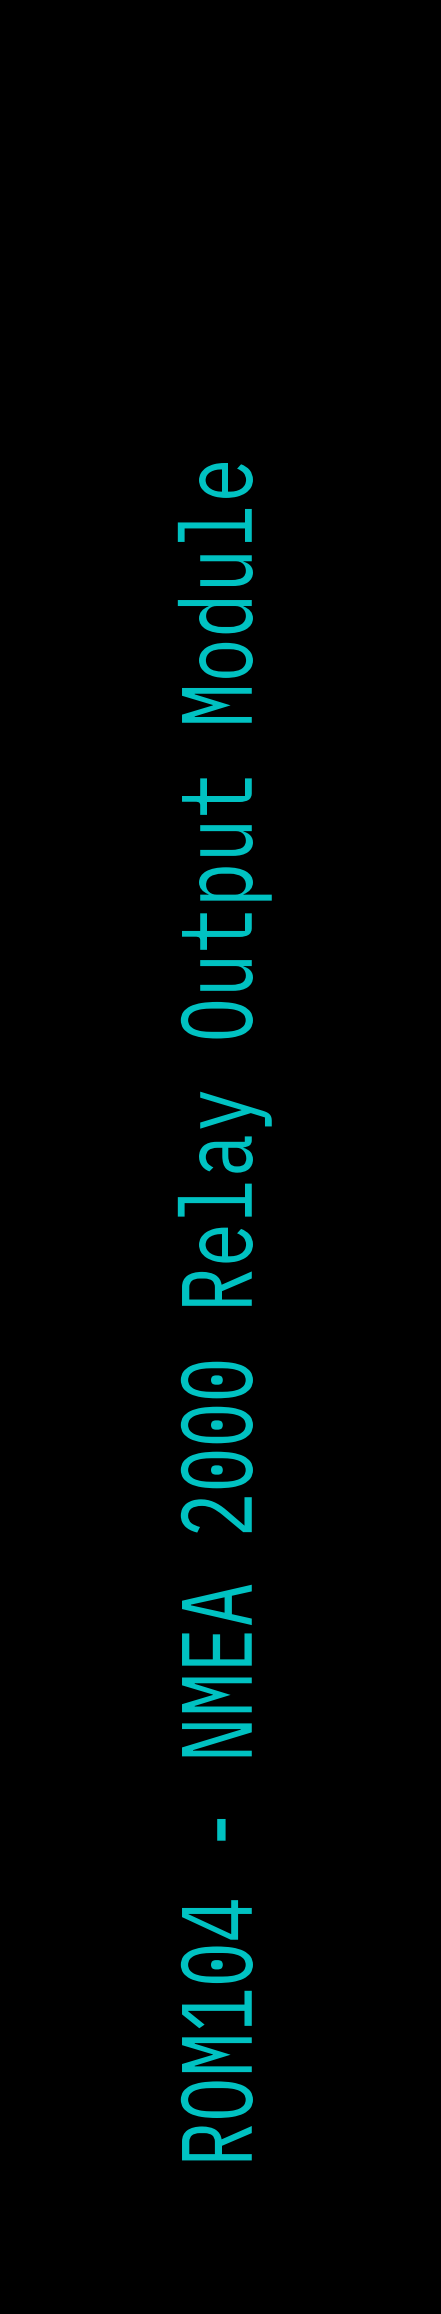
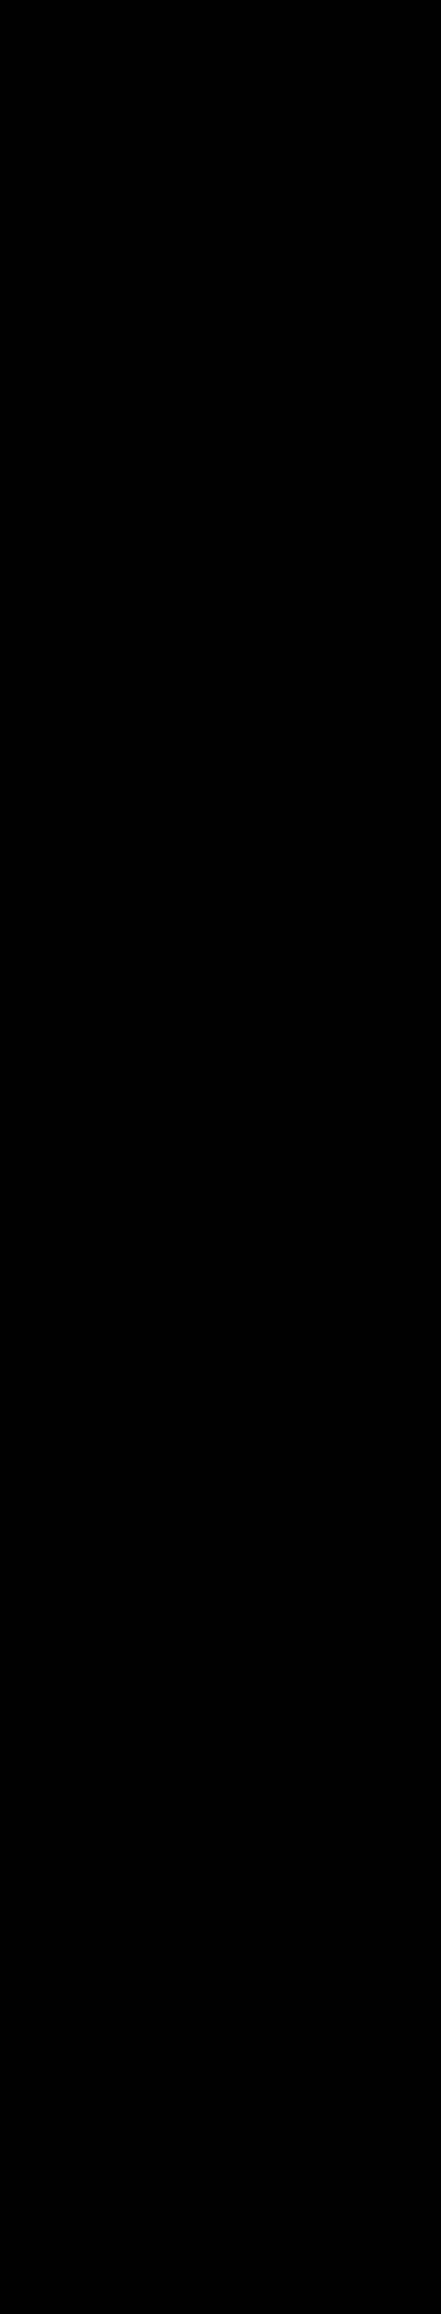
text: ROM104 - NMEA 2000 Relay Output Module (224, 1311) -> none

